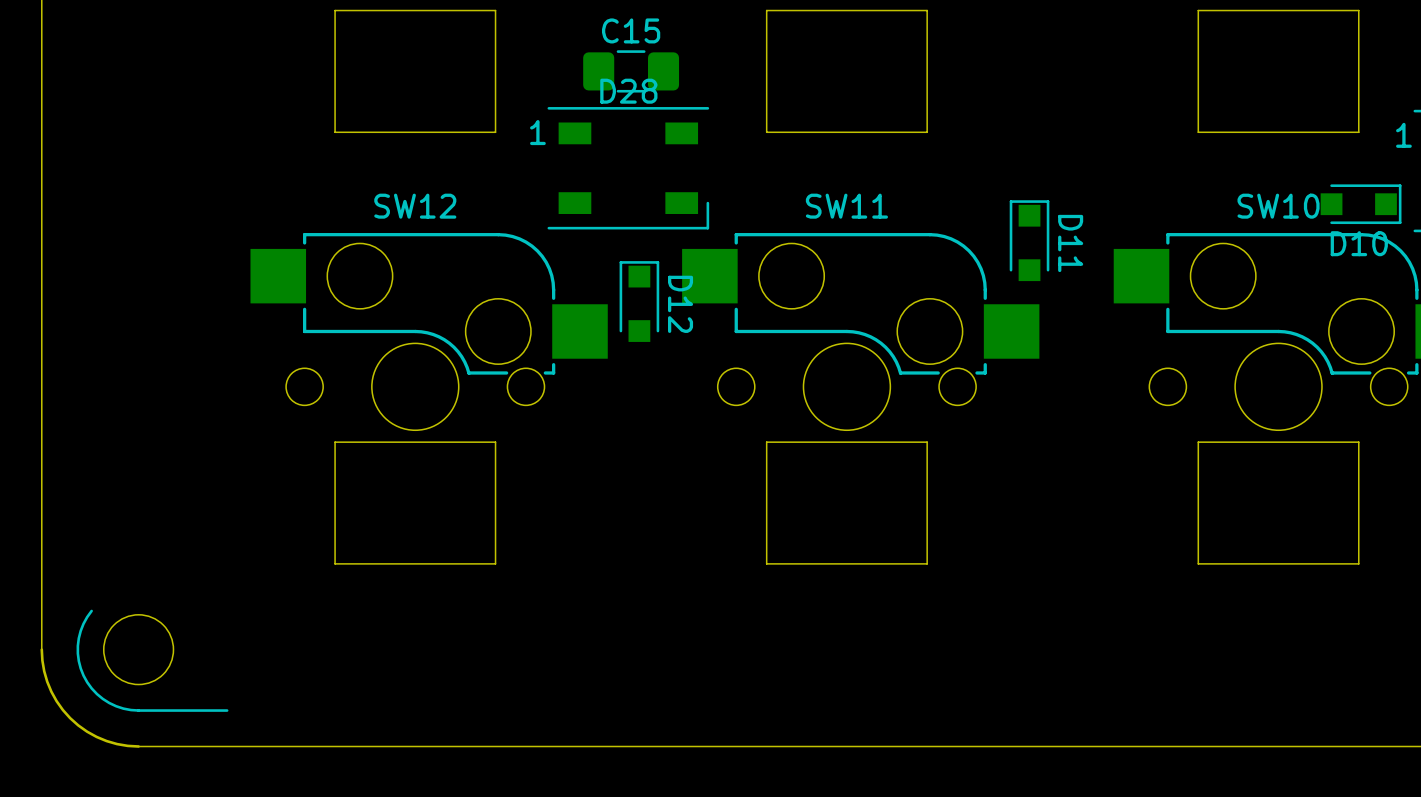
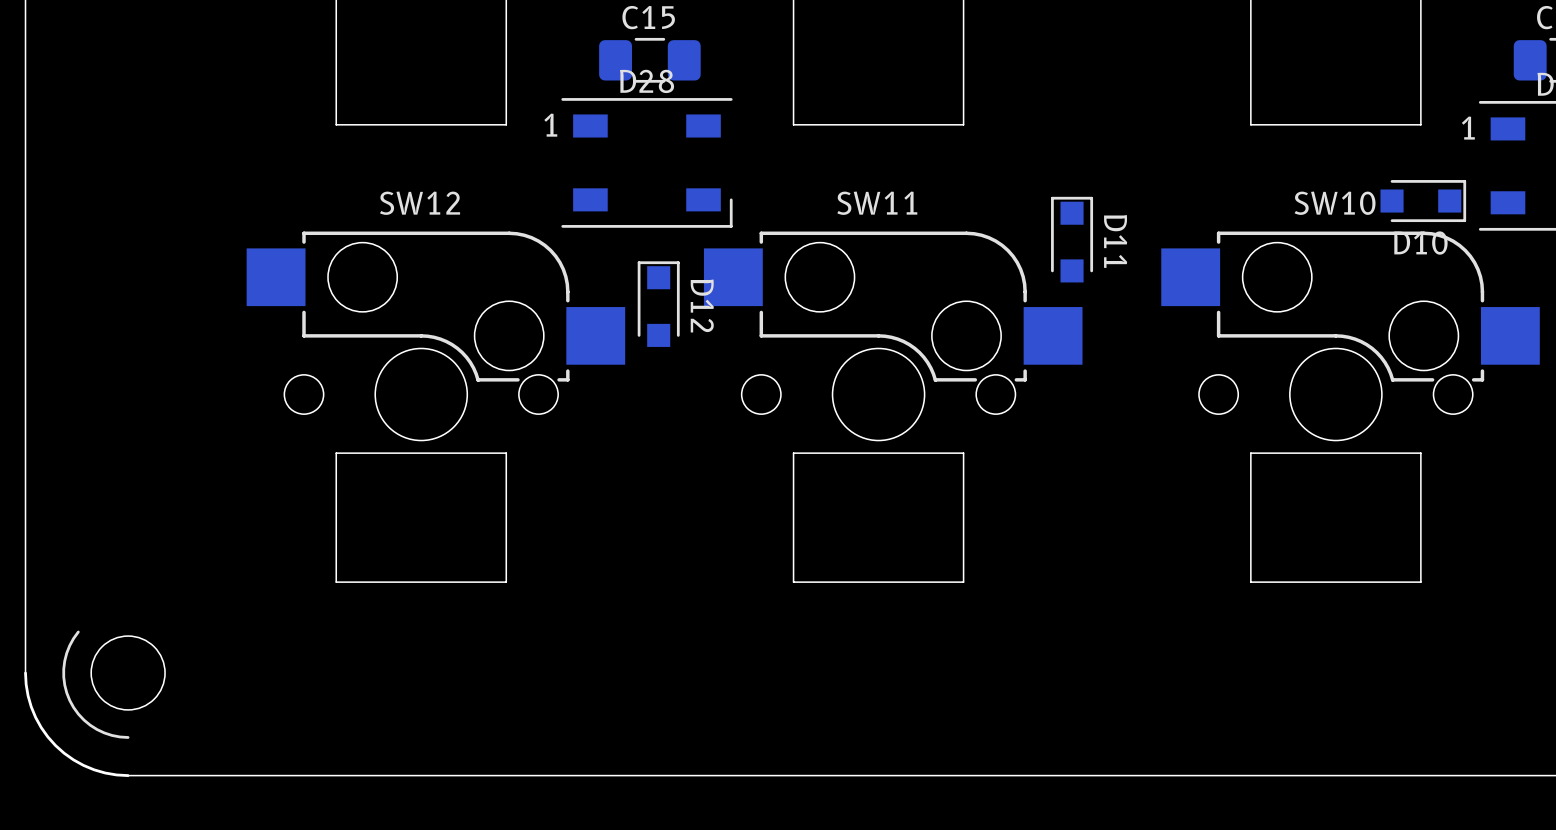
line: (227, 710) (138, 710) -> none

